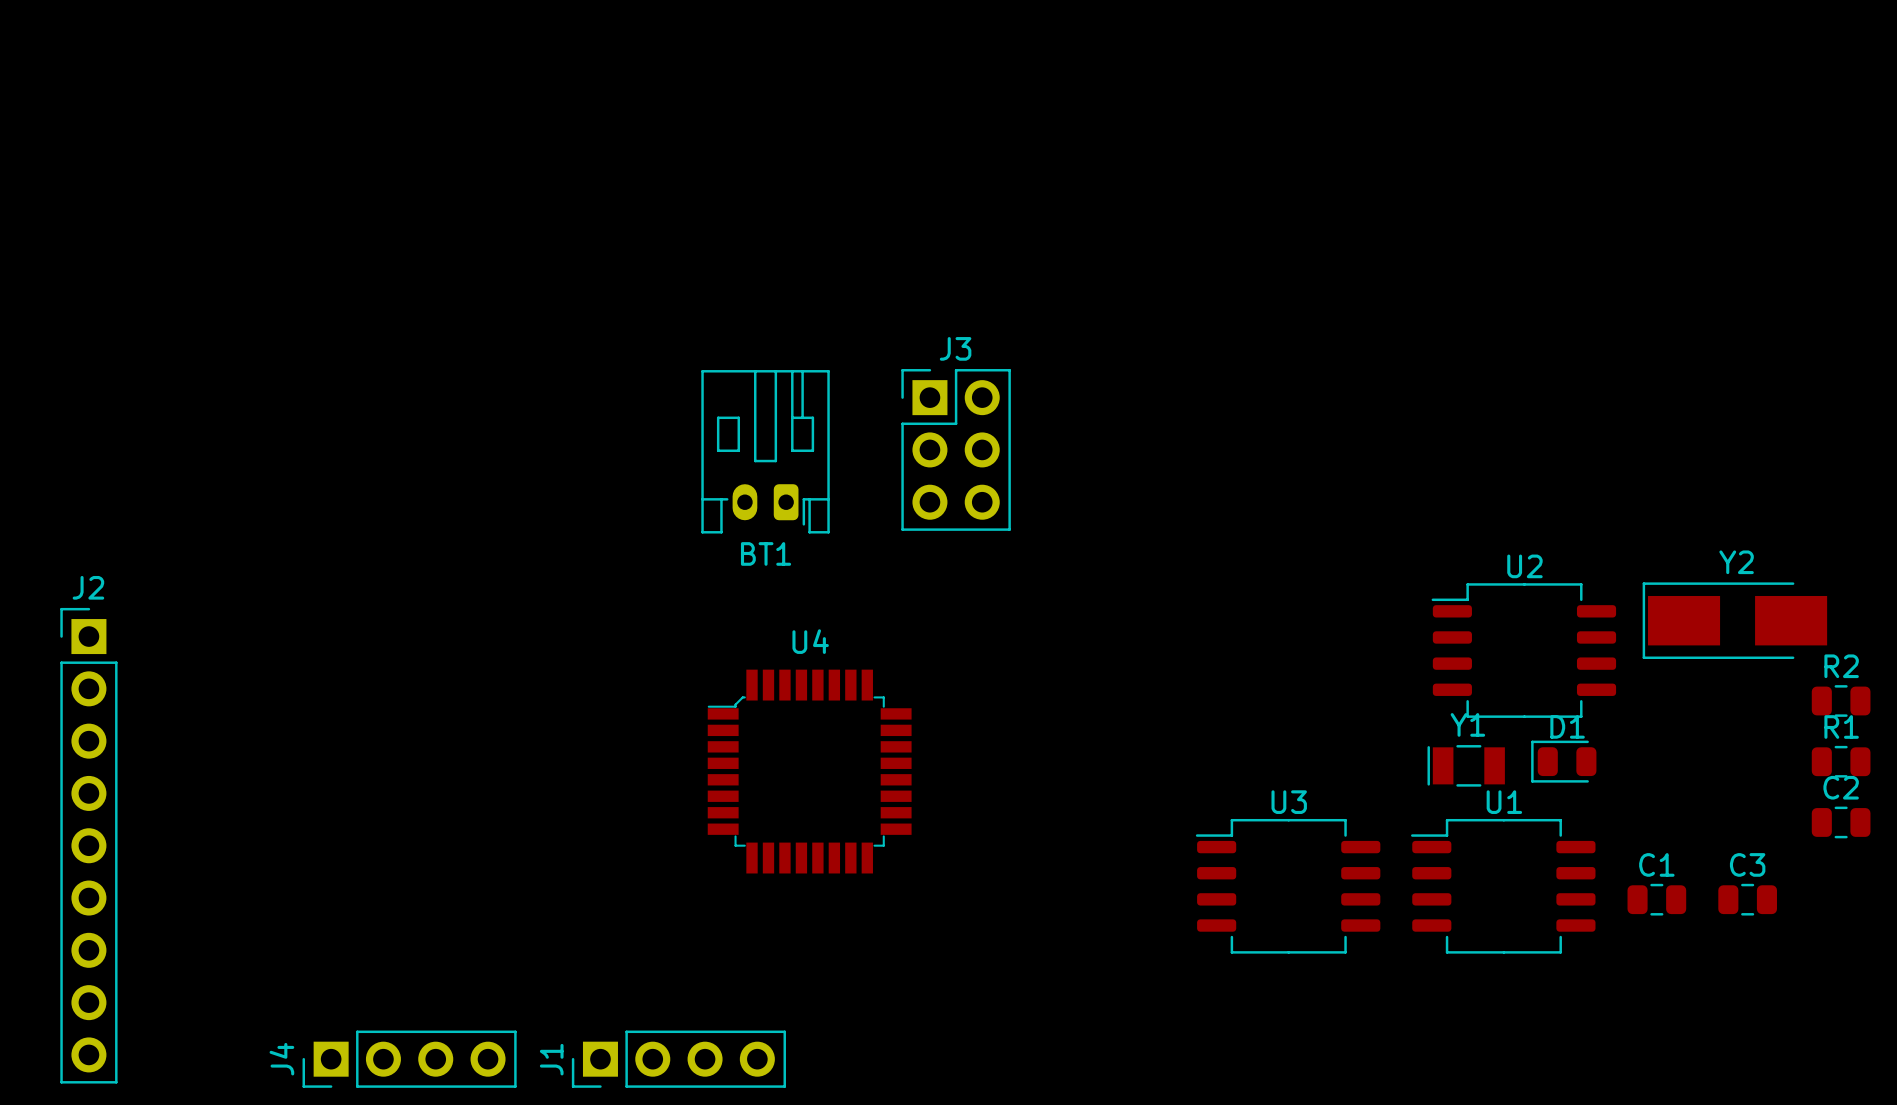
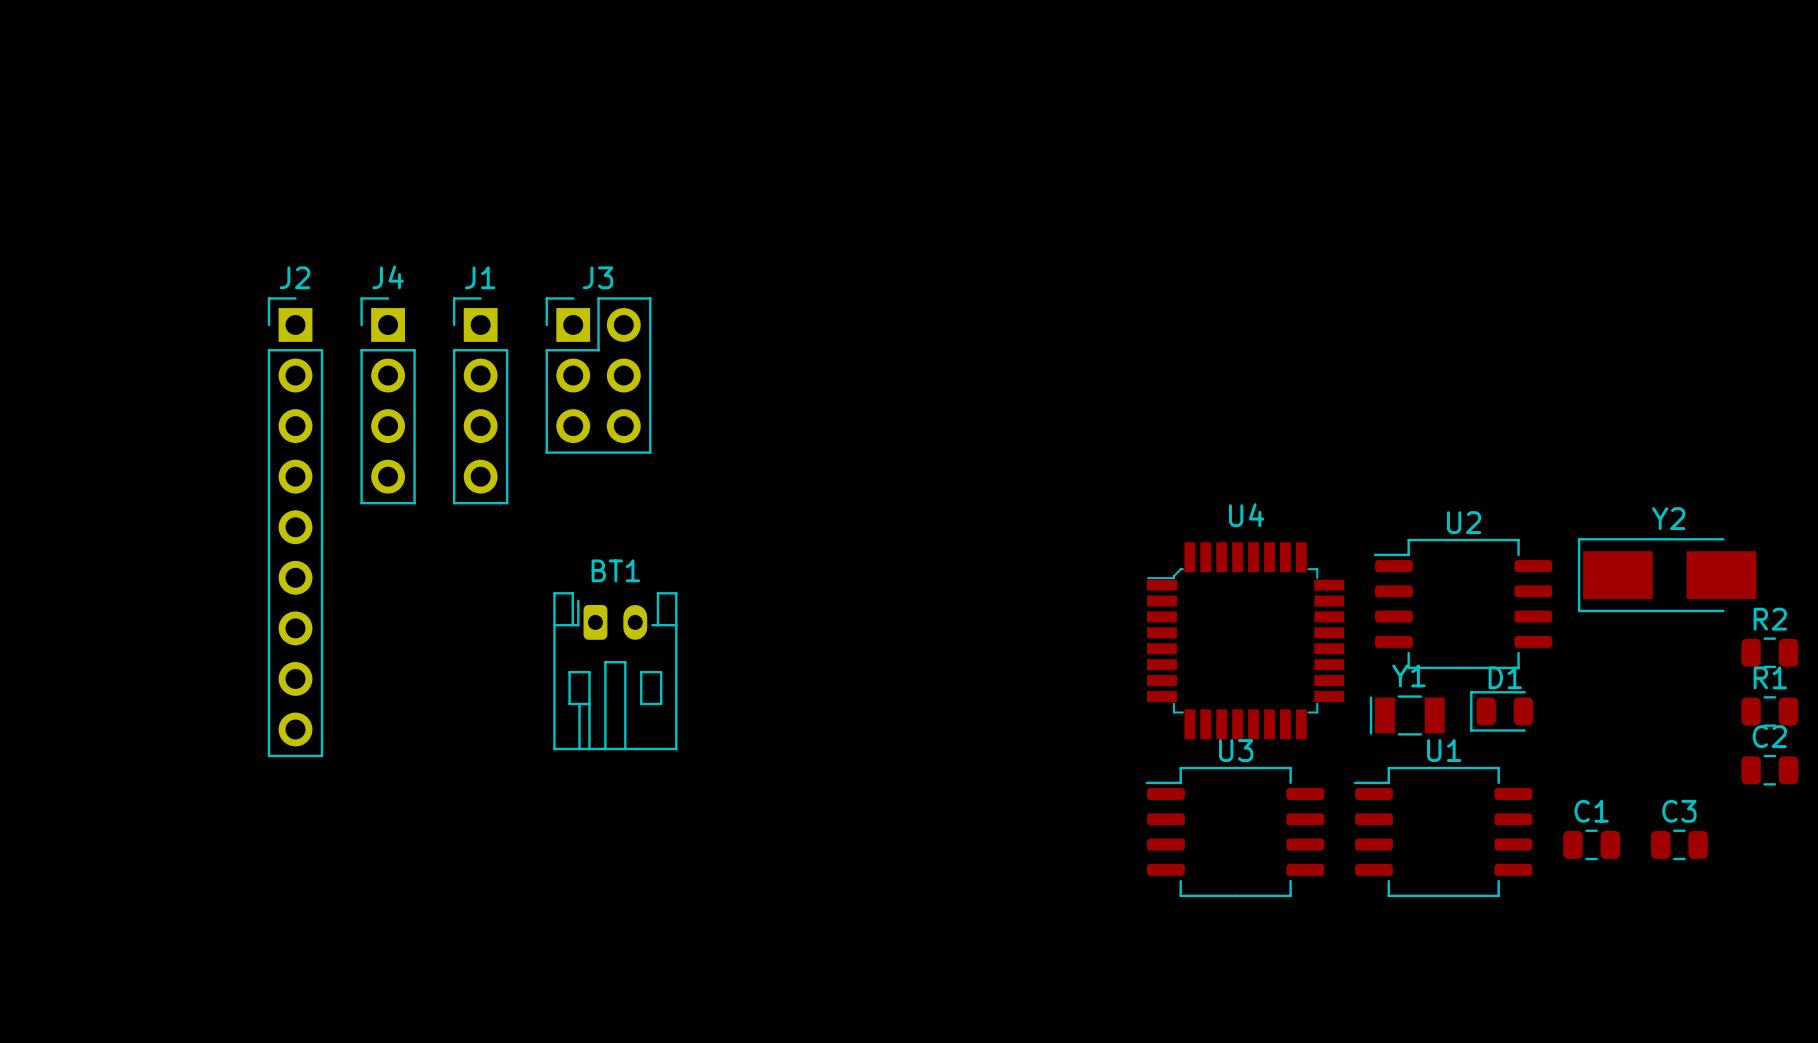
J3 position: (956, 449) -> (598, 375)
BT1 rotation: 0° (765, 451) -> 180° (615, 671)
BT1 position: (765, 451) -> (615, 671)
U4 position: (809, 771) -> (1245, 640)
J2 position: (88, 845) -> (295, 527)
J4 rotation: 0° (409, 1059) -> 90° clockwise (388, 400)
J4 position: (409, 1059) -> (388, 400)
J1 rotation: 0° (678, 1059) -> 90° clockwise (480, 400)
J1 position: (678, 1059) -> (480, 400)

